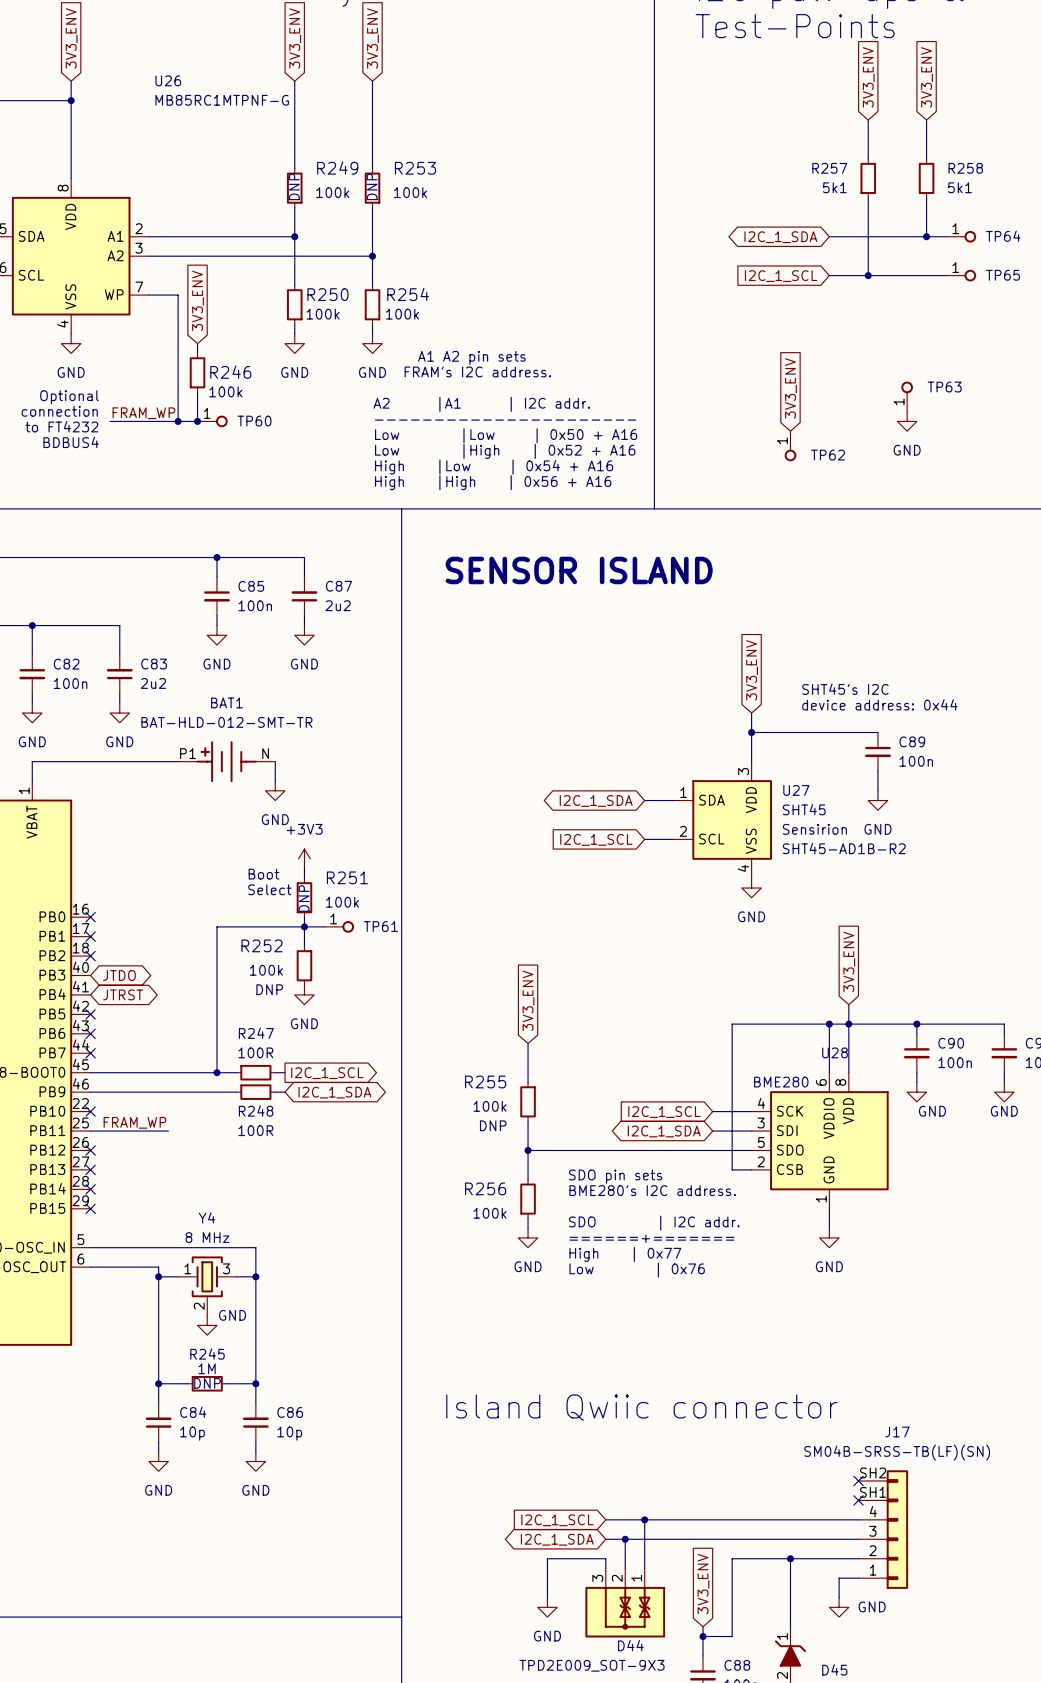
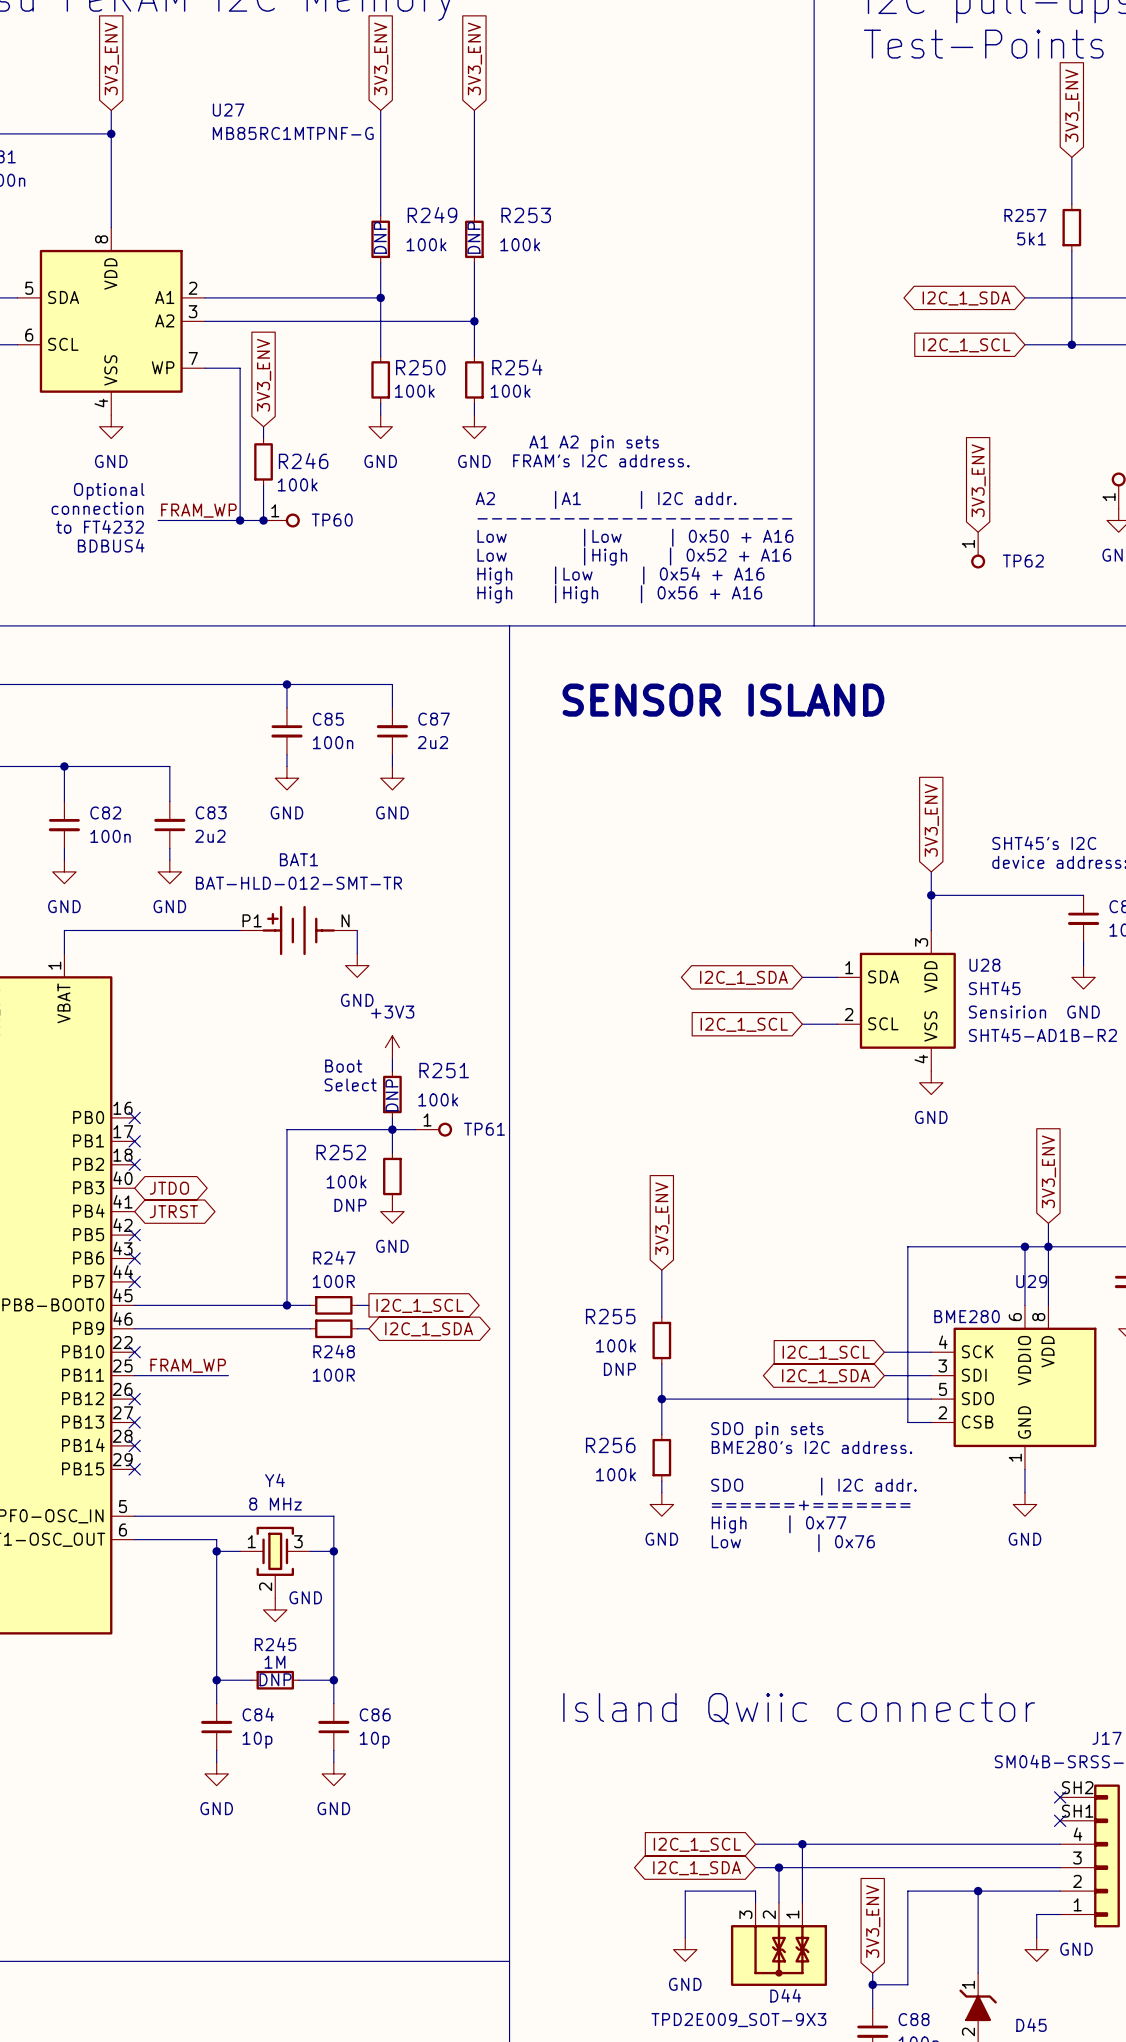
U26 name: U26 (168, 80) -> U27 (228, 110)
U27 name: U27 (796, 790) -> U28 (984, 965)
U28 name: U28 (835, 1052) -> U29 (1031, 1281)

